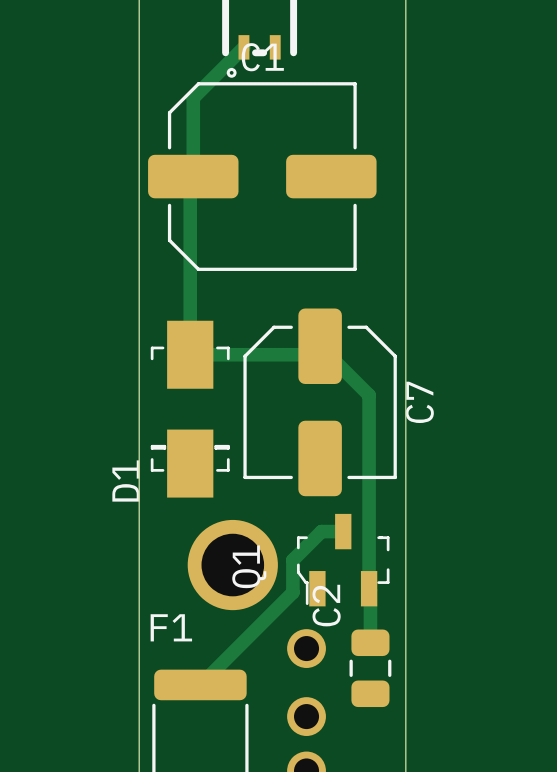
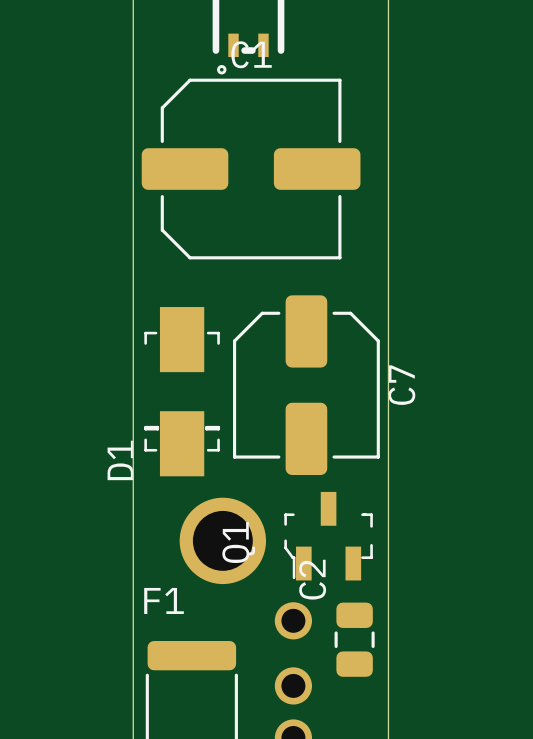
track: (243, 47) (193, 98) (193, 176) (190, 179) (190, 354) (311, 354) (320, 346) (369, 395) (370, 642) -> none
track: (343, 531) (321, 531) (292, 560) (292, 592) (200, 684) -> none

